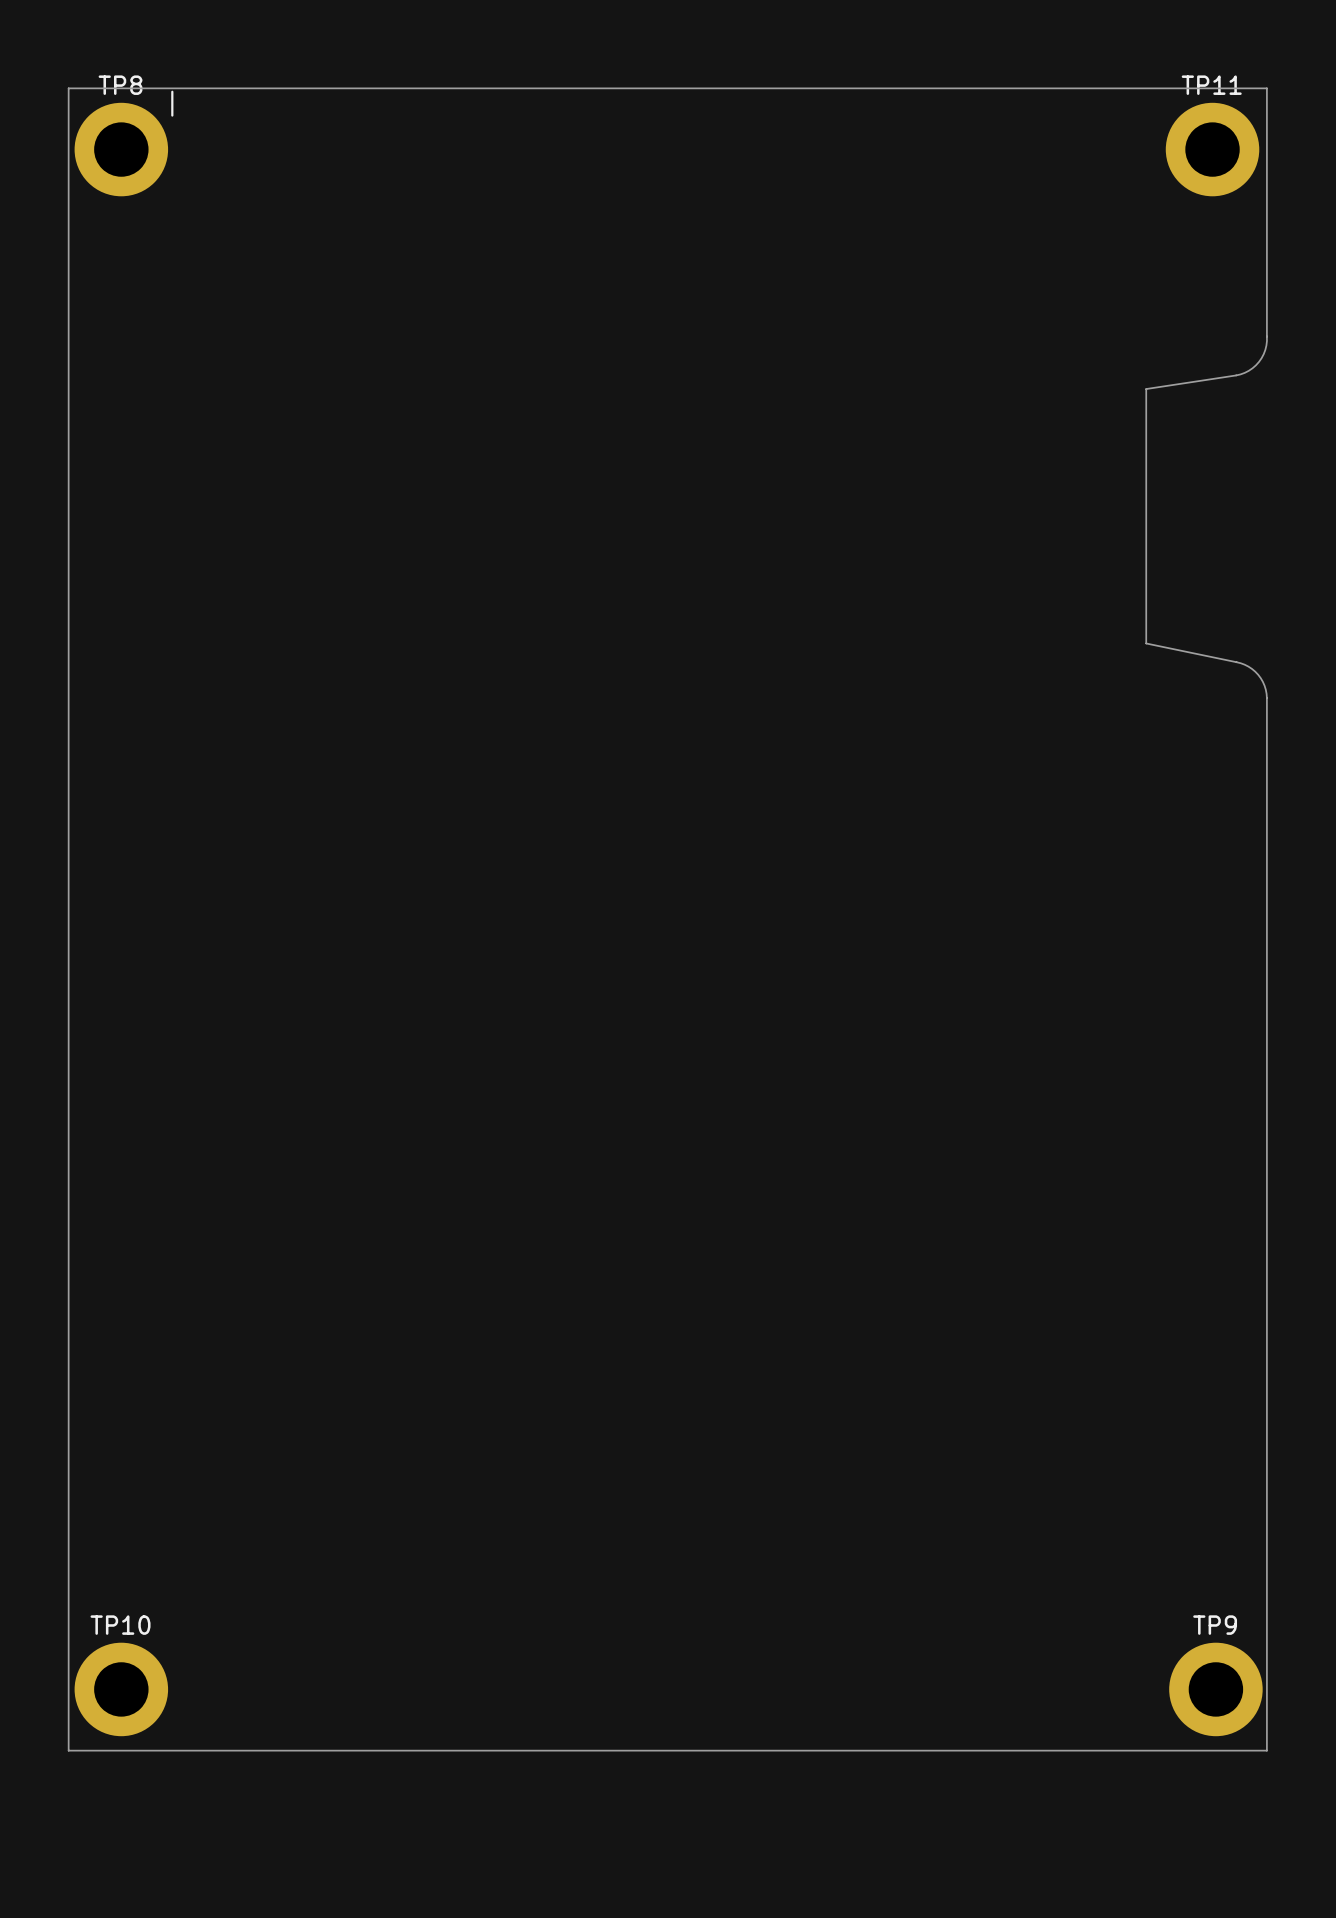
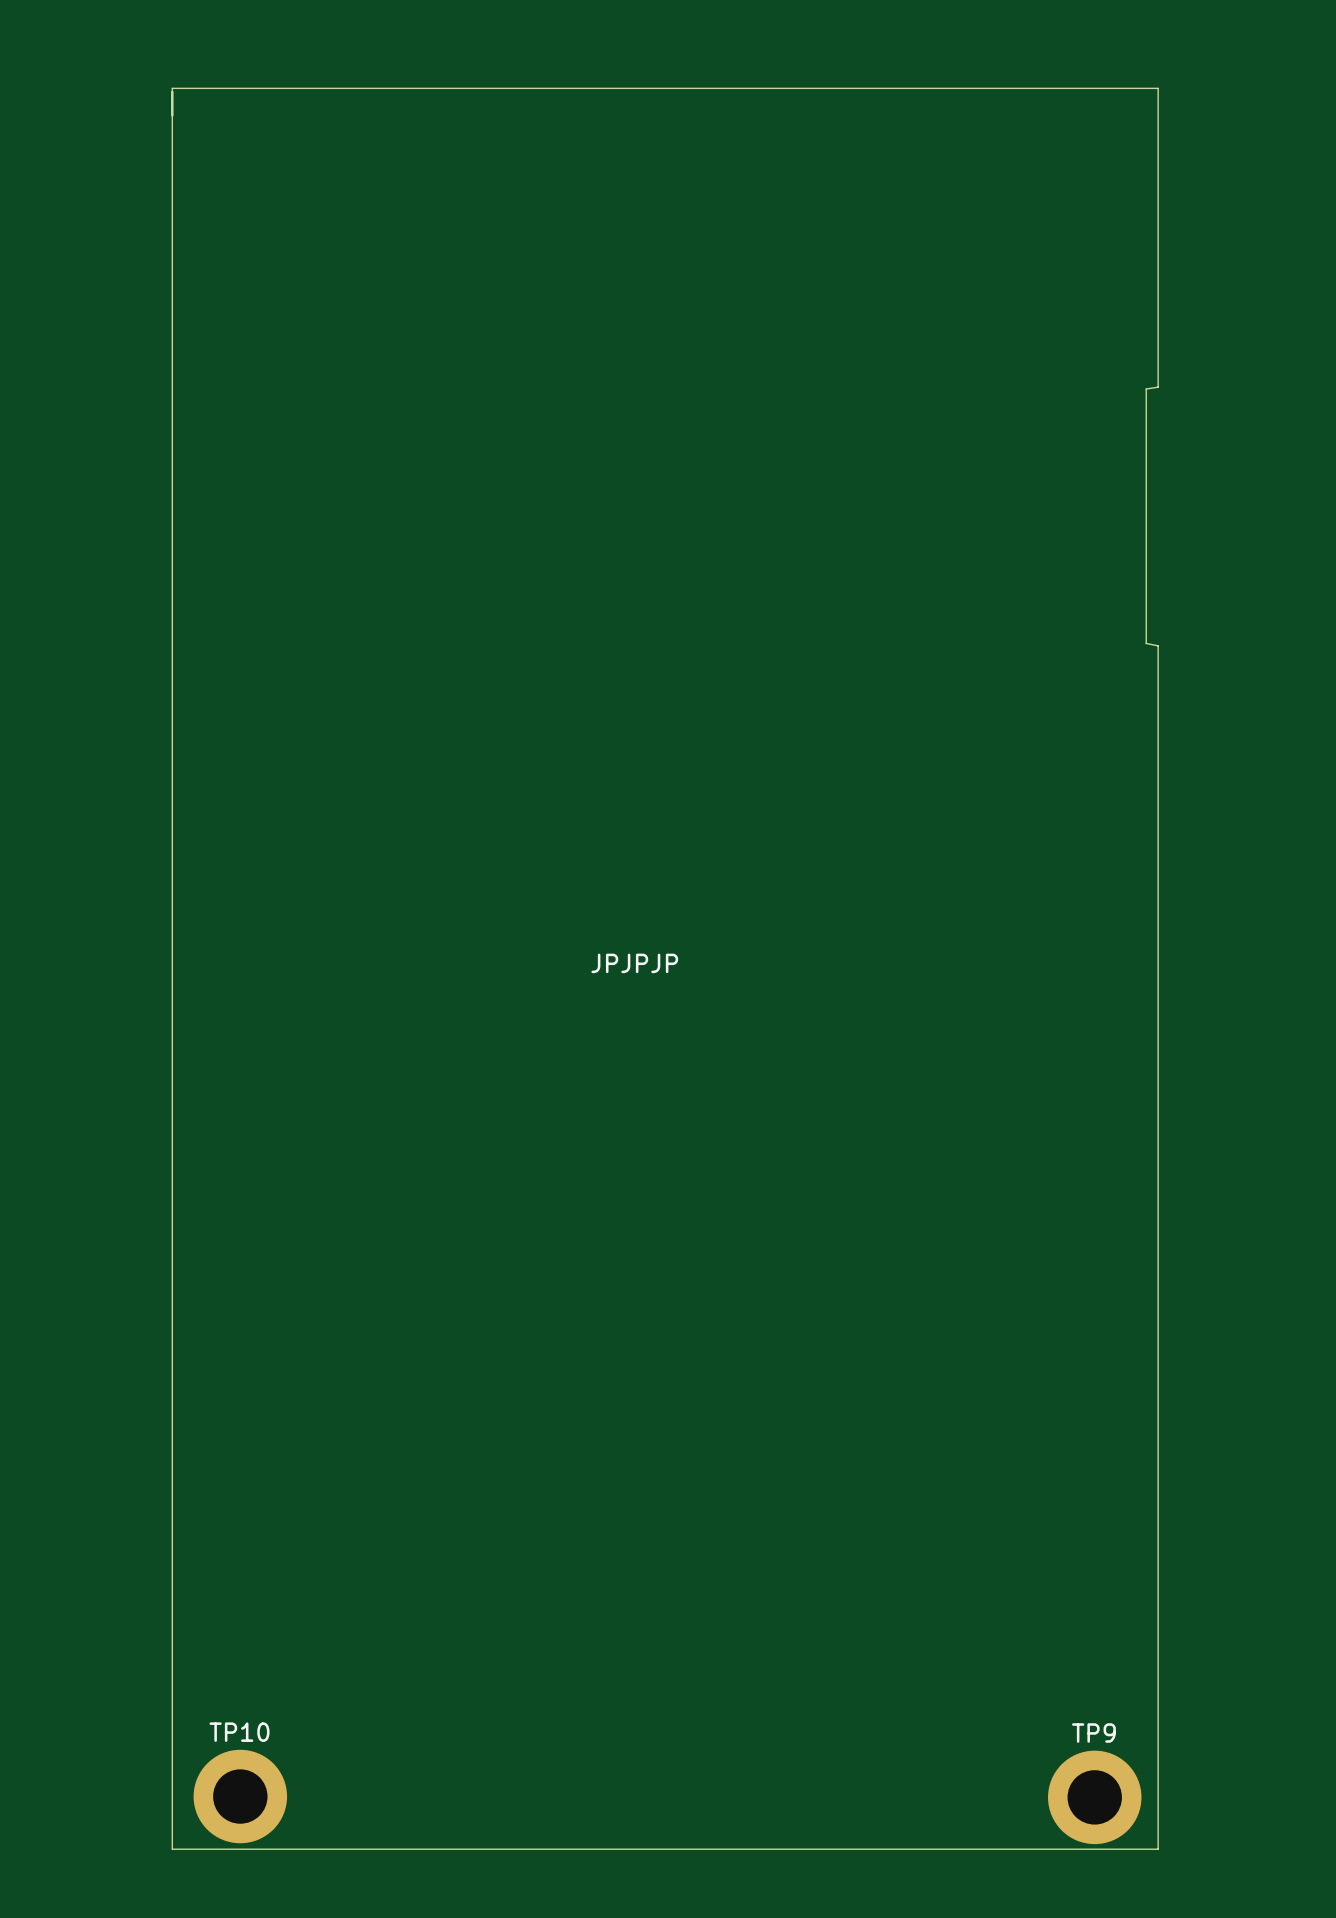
board edge: (172, 88) (68, 88) (68, 1750) (1266, 1750) (1266, 693) (1260, 678) (1244, 664) (1146, 643) -> (172, 88) (172, 1849) (1158, 1849) (1158, 645) (1146, 643)
board edge: (1158, 88) (1266, 88) (1266, 341) (1261, 358) (1256, 365) (1244, 372) (1146, 389) -> (1158, 88) (1158, 387) (1146, 389)
TP8: (121, 149) -> none
TP11: (1212, 149) -> none
text: none -> JPJPJP (634, 963)
TP10 position: (121, 1689) -> (240, 1796)
TP9 position: (1215, 1689) -> (1094, 1797)

